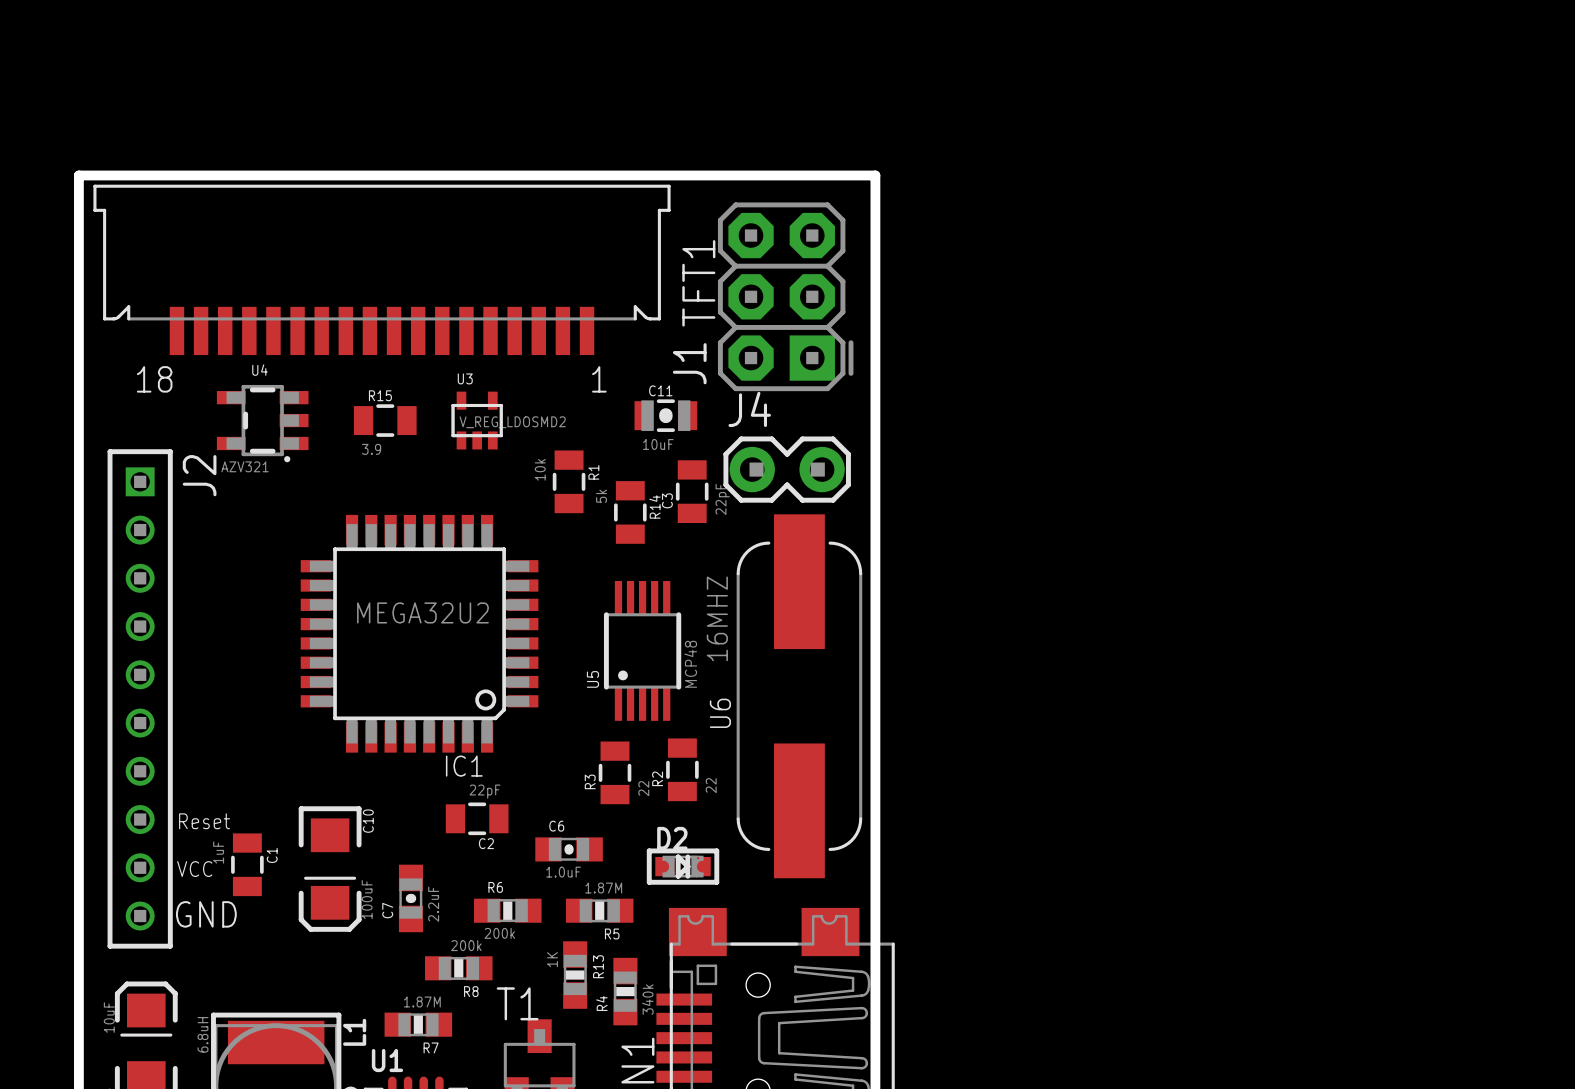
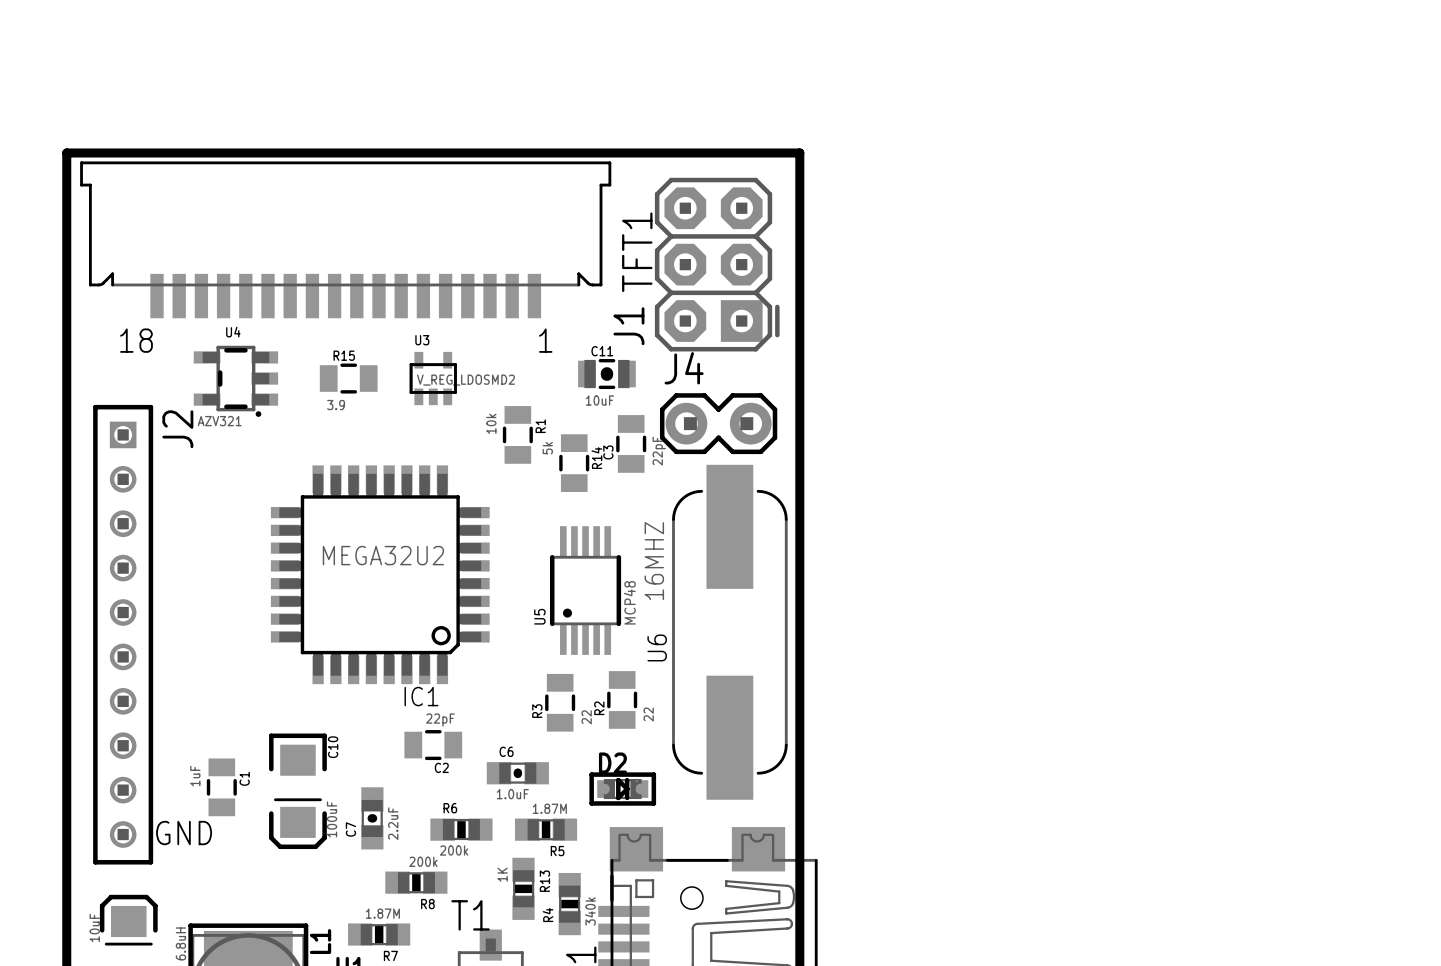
text: Reset (204, 821) -> none
text: VCC (194, 869) -> none

